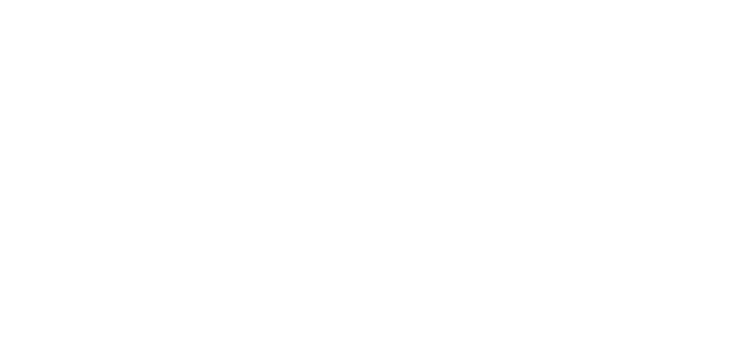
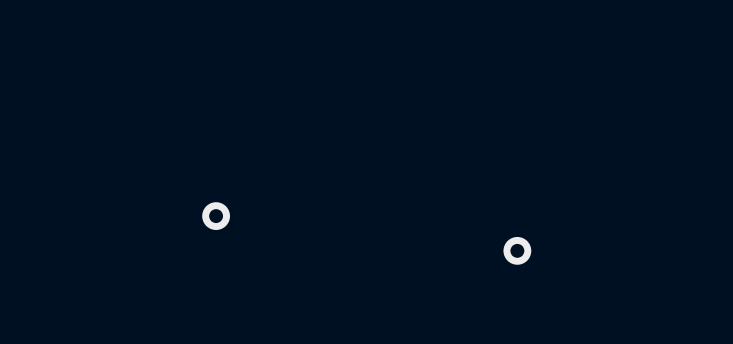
via: none -> (216, 216)
via: none -> (517, 250)

